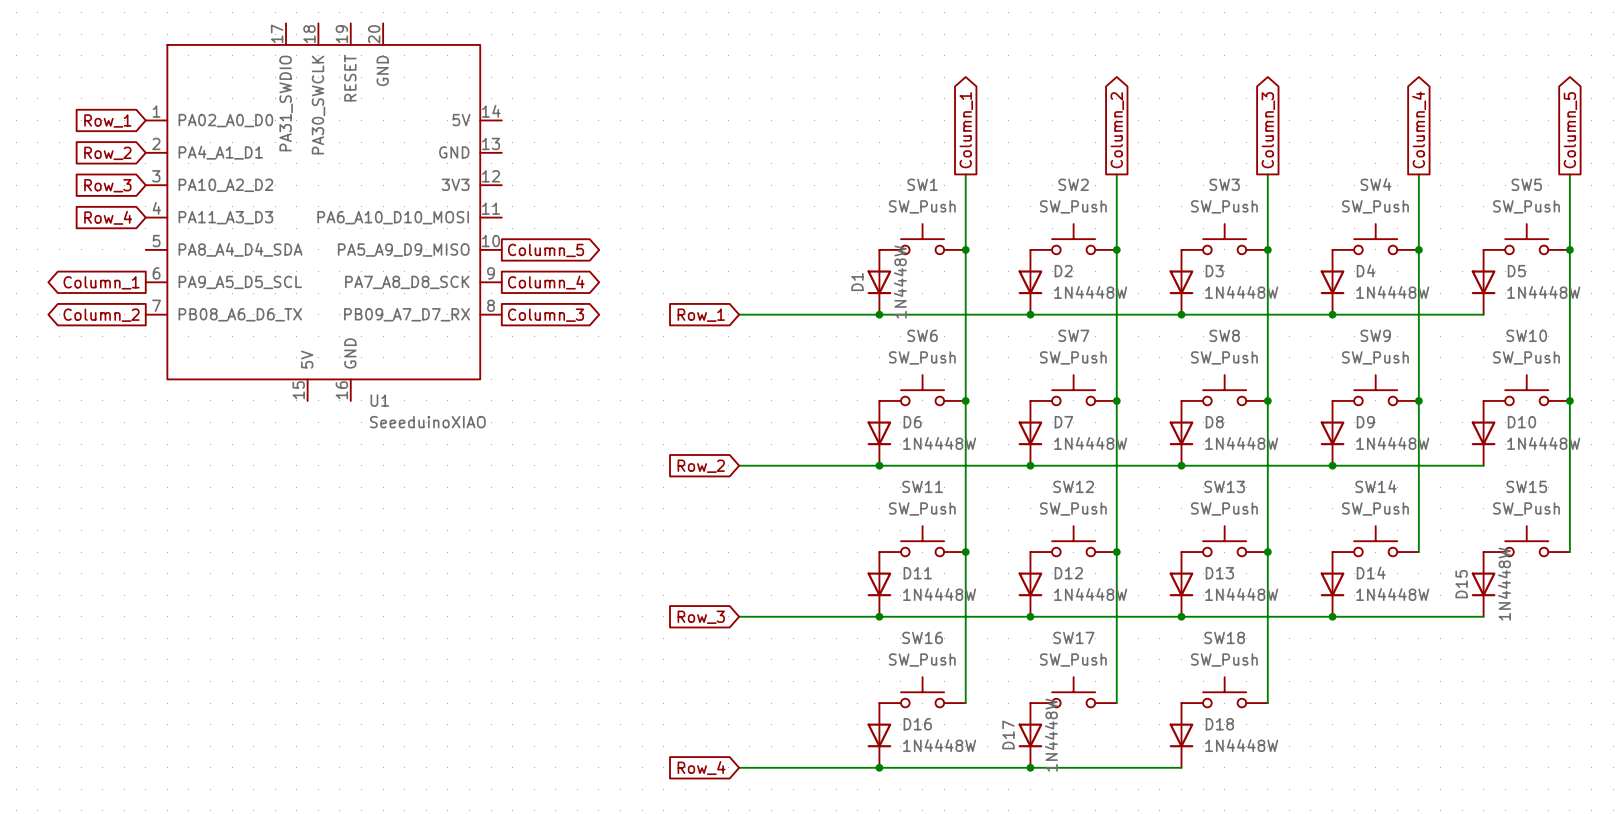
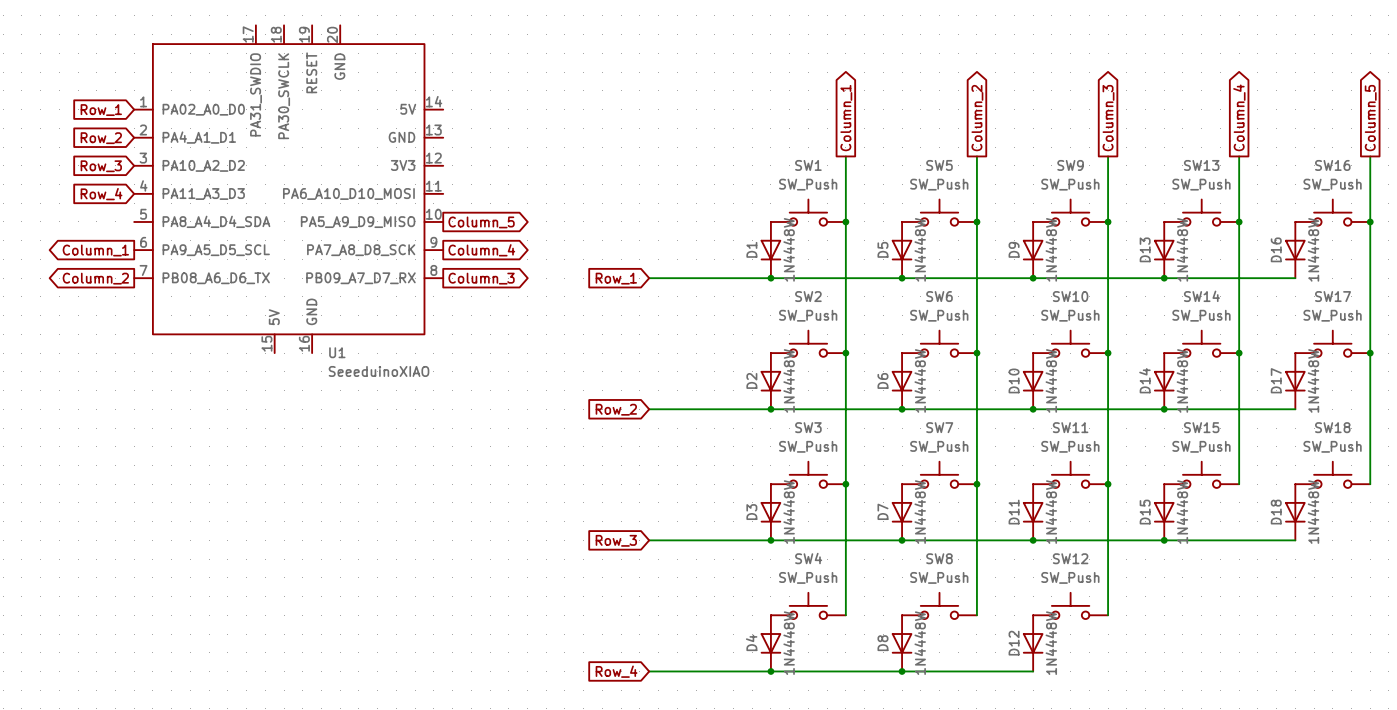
SW2 name: SW2 (1073, 184) -> SW5 (939, 165)
SW3 name: SW3 (1224, 184) -> SW9 (1070, 165)
SW4 name: SW4 (1375, 184) -> SW13 (1201, 165)
SW5 name: SW5 (1526, 184) -> SW16 (1332, 165)
D4 name: D4 (1366, 270) -> D13 (1145, 249)
D2 name: D2 (1063, 271) -> D5 (882, 249)
D3 name: D3 (1214, 271) -> D9 (1014, 249)
D5 name: D5 (1516, 271) -> D16 (1276, 249)
D2 value rotation: 0° (1090, 292) -> 90° counterclockwise (920, 249)
D3 value rotation: 0° (1241, 292) -> 90° counterclockwise (1051, 249)
D4 value rotation: 0° (1392, 292) -> 90° counterclockwise (1182, 249)
D5 value rotation: 0° (1543, 292) -> 90° counterclockwise (1313, 249)
SW6 name: SW6 (922, 335) -> SW2 (808, 296)
SW7 name: SW7 (1073, 335) -> SW6 (939, 296)
SW8 name: SW8 (1224, 335) -> SW10 (1070, 296)
SW9 name: SW9 (1375, 335) -> SW14 (1201, 296)
SW10 name: SW10 (1526, 335) -> SW17 (1333, 296)
D6 name: D6 (912, 422) -> D2 (751, 380)
D7 name: D7 (1063, 422) -> D6 (882, 380)
D8 name: D8 (1214, 422) -> D10 (1014, 380)
D9 name: D9 (1365, 422) -> D14 (1144, 380)
D10 name: D10 (1521, 422) -> D17 (1276, 380)
D6 value rotation: 0° (939, 443) -> 90° counterclockwise (789, 380)
D7 value rotation: 0° (1090, 443) -> 90° counterclockwise (920, 380)
D8 value rotation: 0° (1241, 443) -> 90° counterclockwise (1051, 380)
D9 value rotation: 0° (1392, 443) -> 90° counterclockwise (1182, 380)
D10 value rotation: 0° (1543, 443) -> 90° counterclockwise (1313, 380)
SW11 name: SW11 (922, 486) -> SW3 (808, 427)
SW12 name: SW12 (1073, 486) -> SW7 (939, 427)
SW13 name: SW13 (1224, 486) -> SW11 (1070, 427)
SW14 name: SW14 (1375, 486) -> SW15 (1201, 427)
SW15 name: SW15 (1526, 486) -> SW18 (1332, 427)
D14 name: D14 (1371, 572) -> D15 (1145, 512)
D11 name: D11 (917, 573) -> D3 (751, 512)
D12 name: D12 (1068, 573) -> D7 (882, 511)
D13 name: D13 (1219, 573) -> D11 (1014, 512)
D15 name: D15 (1461, 584) -> D18 (1276, 512)
D11 value rotation: 0° (939, 594) -> 90° counterclockwise (789, 512)
D12 value rotation: 0° (1090, 594) -> 90° counterclockwise (920, 512)
D13 value rotation: 0° (1241, 594) -> 90° counterclockwise (1051, 512)
D14 value rotation: 0° (1392, 594) -> 90° counterclockwise (1182, 512)
SW16 name: SW16 (922, 637) -> SW4 (808, 558)
SW17 name: SW17 (1073, 637) -> SW8 (939, 558)
SW18 name: SW18 (1224, 637) -> SW12 (1070, 558)
D16 name: D16 (917, 724) -> D4 (751, 642)
D18 name: D18 (1219, 724) -> D12 (1014, 643)
D17 name: D17 (1008, 734) -> D8 (882, 643)
D16 value rotation: 0° (939, 745) -> 90° counterclockwise (789, 643)
D18 value rotation: 0° (1241, 745) -> 90° counterclockwise (1051, 643)

